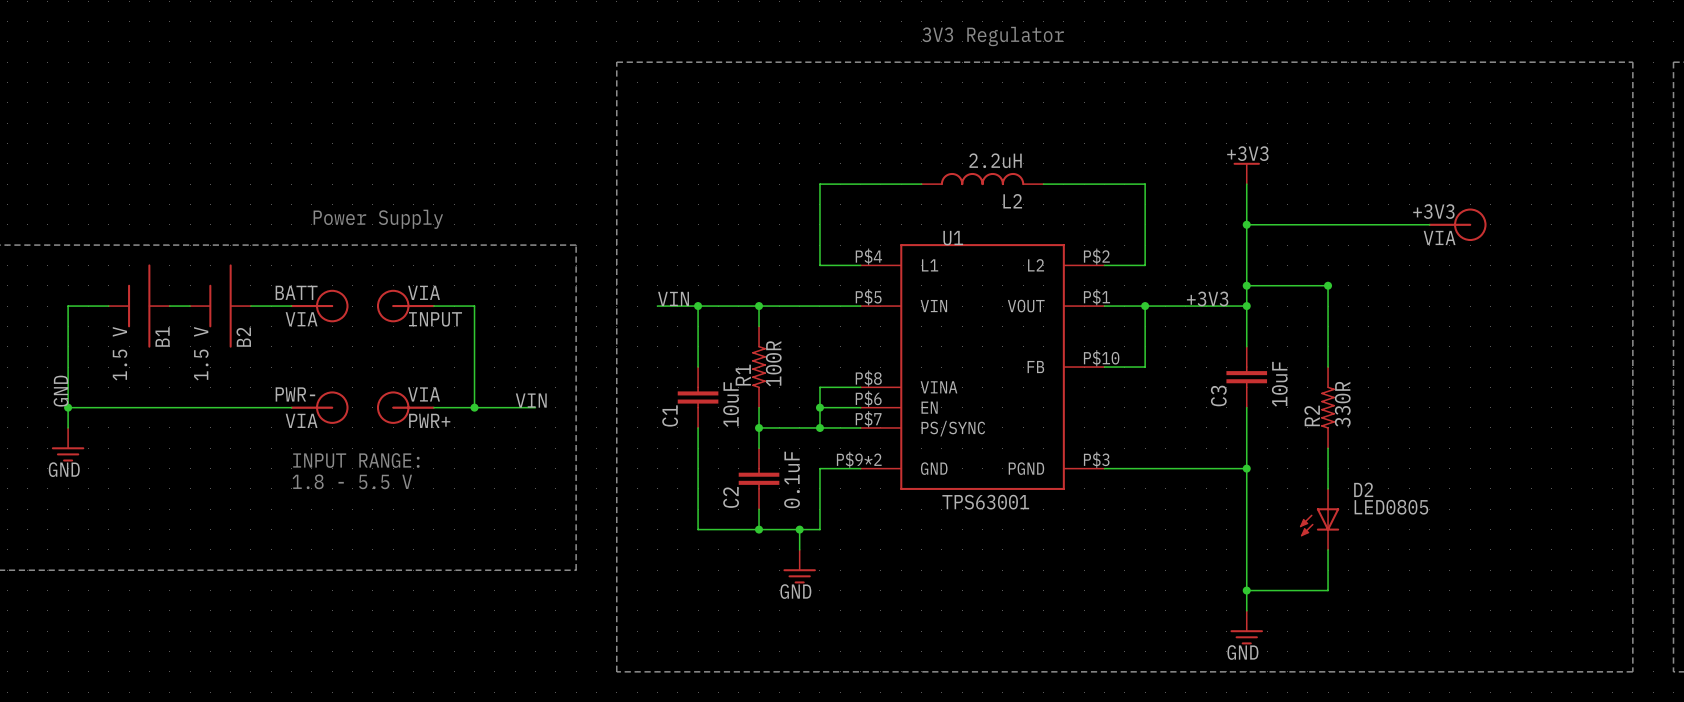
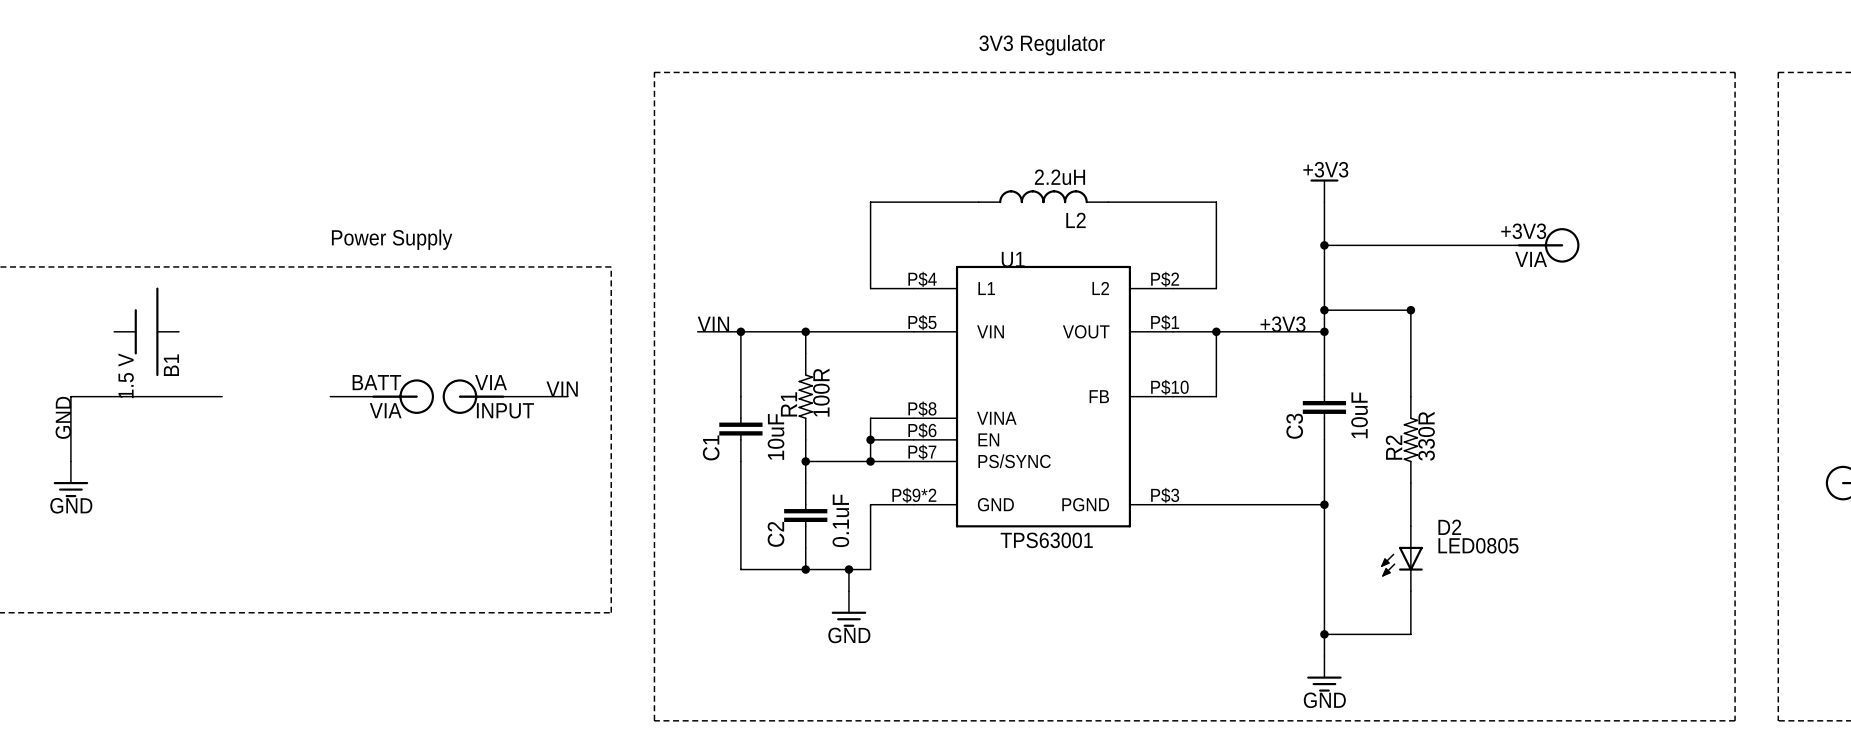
wire: (108, 306) (68, 306) (68, 367) -> (222, 396) (70, 396)
wire: (169, 306) (190, 306) -> none
B2: 1.5 V (220, 306) -> none
wire: (250, 306) (291, 306) -> (330, 396) (373, 396)
part position: (319, 306) -> (403, 396)
part position: (405, 306) -> (473, 396)
wire: (433, 306) (474, 306) (474, 407) -> none
wire: none -> (503, 396) (568, 396)
label position: VIN (531, 400) -> VIN (562, 389)
wire: (68, 407) (291, 407) -> none
junction: (68, 407) -> none
part: PWR- (319, 407) -> none
part: PWR+ (405, 407) -> none
wire: (433, 407) (535, 407) -> none
junction: (474, 407) -> none
text: INPUT RANGE: (356, 460) -> none
text: 1.8 - 5.5 V (352, 481) -> none

